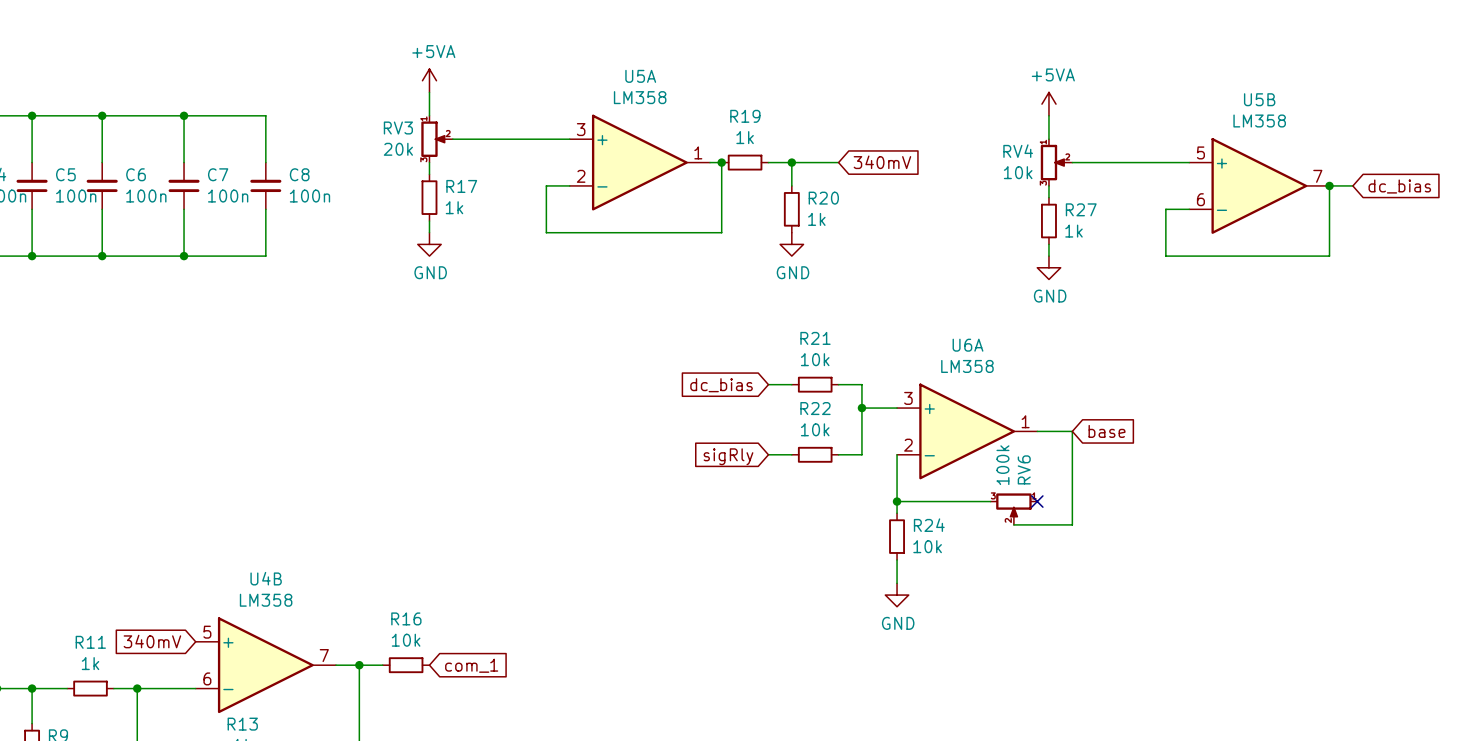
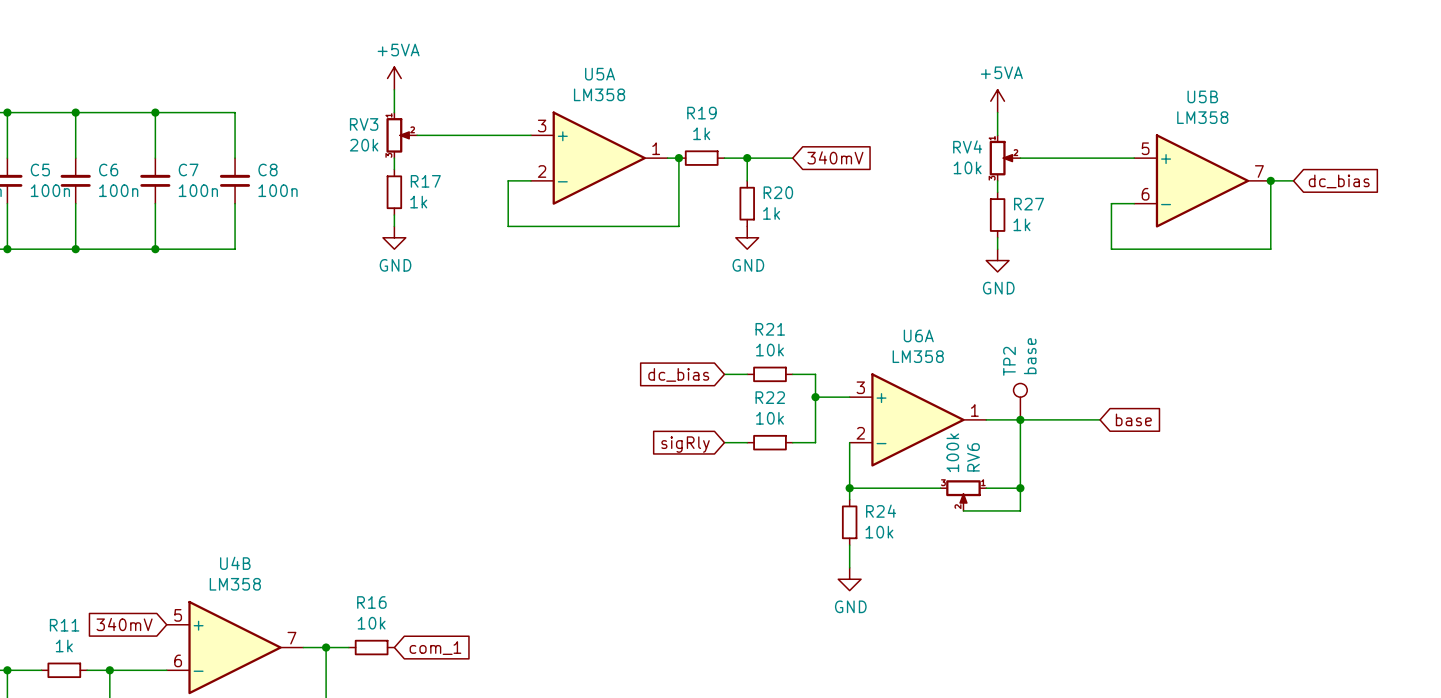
TP2: none -> base (1020, 401)
wire: none -> (1020, 419) (1100, 419)
junction: none -> (1020, 419)
global label position: base (1107, 431) -> base (1133, 419)
wire: none -> (986, 488) (1020, 488)
no-connect mark: (1037, 501) -> none
junction: none -> (1020, 488)

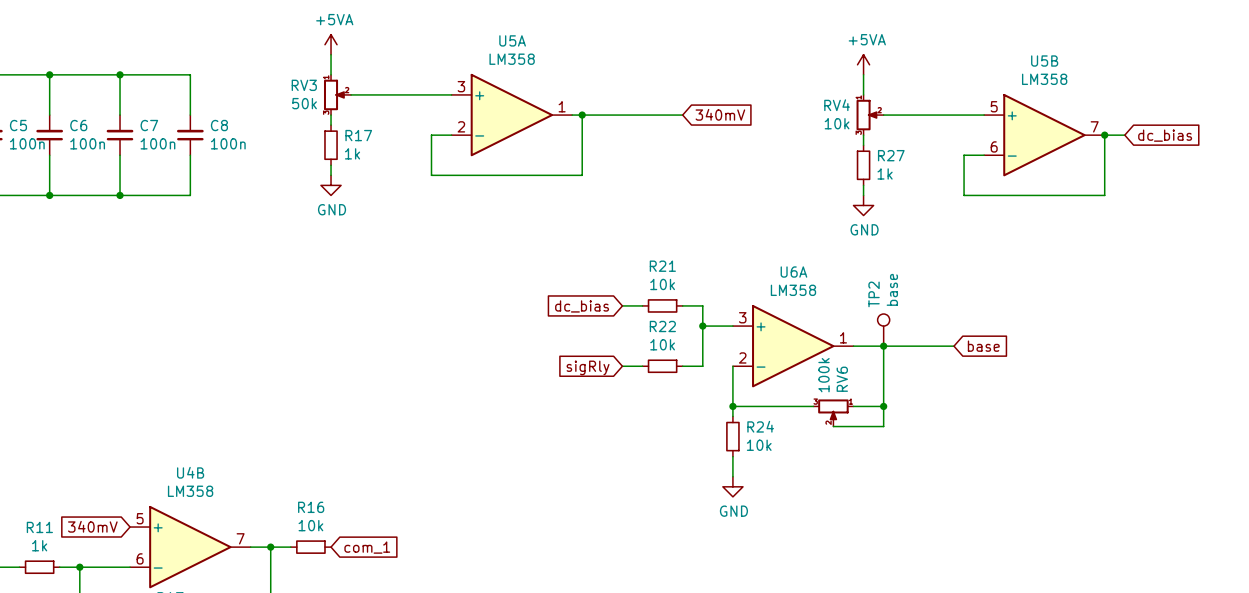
RV3 value: 20k (364, 145) -> 50k (304, 103)
wire: none -> (582, 115) (622, 115)
R19: 1k (701, 158) -> none
wire: (747, 158) (747, 180) -> none
junction: (747, 158) -> none
R20: 1k (747, 203) -> none
power symbol: GND (747, 237) -> none

